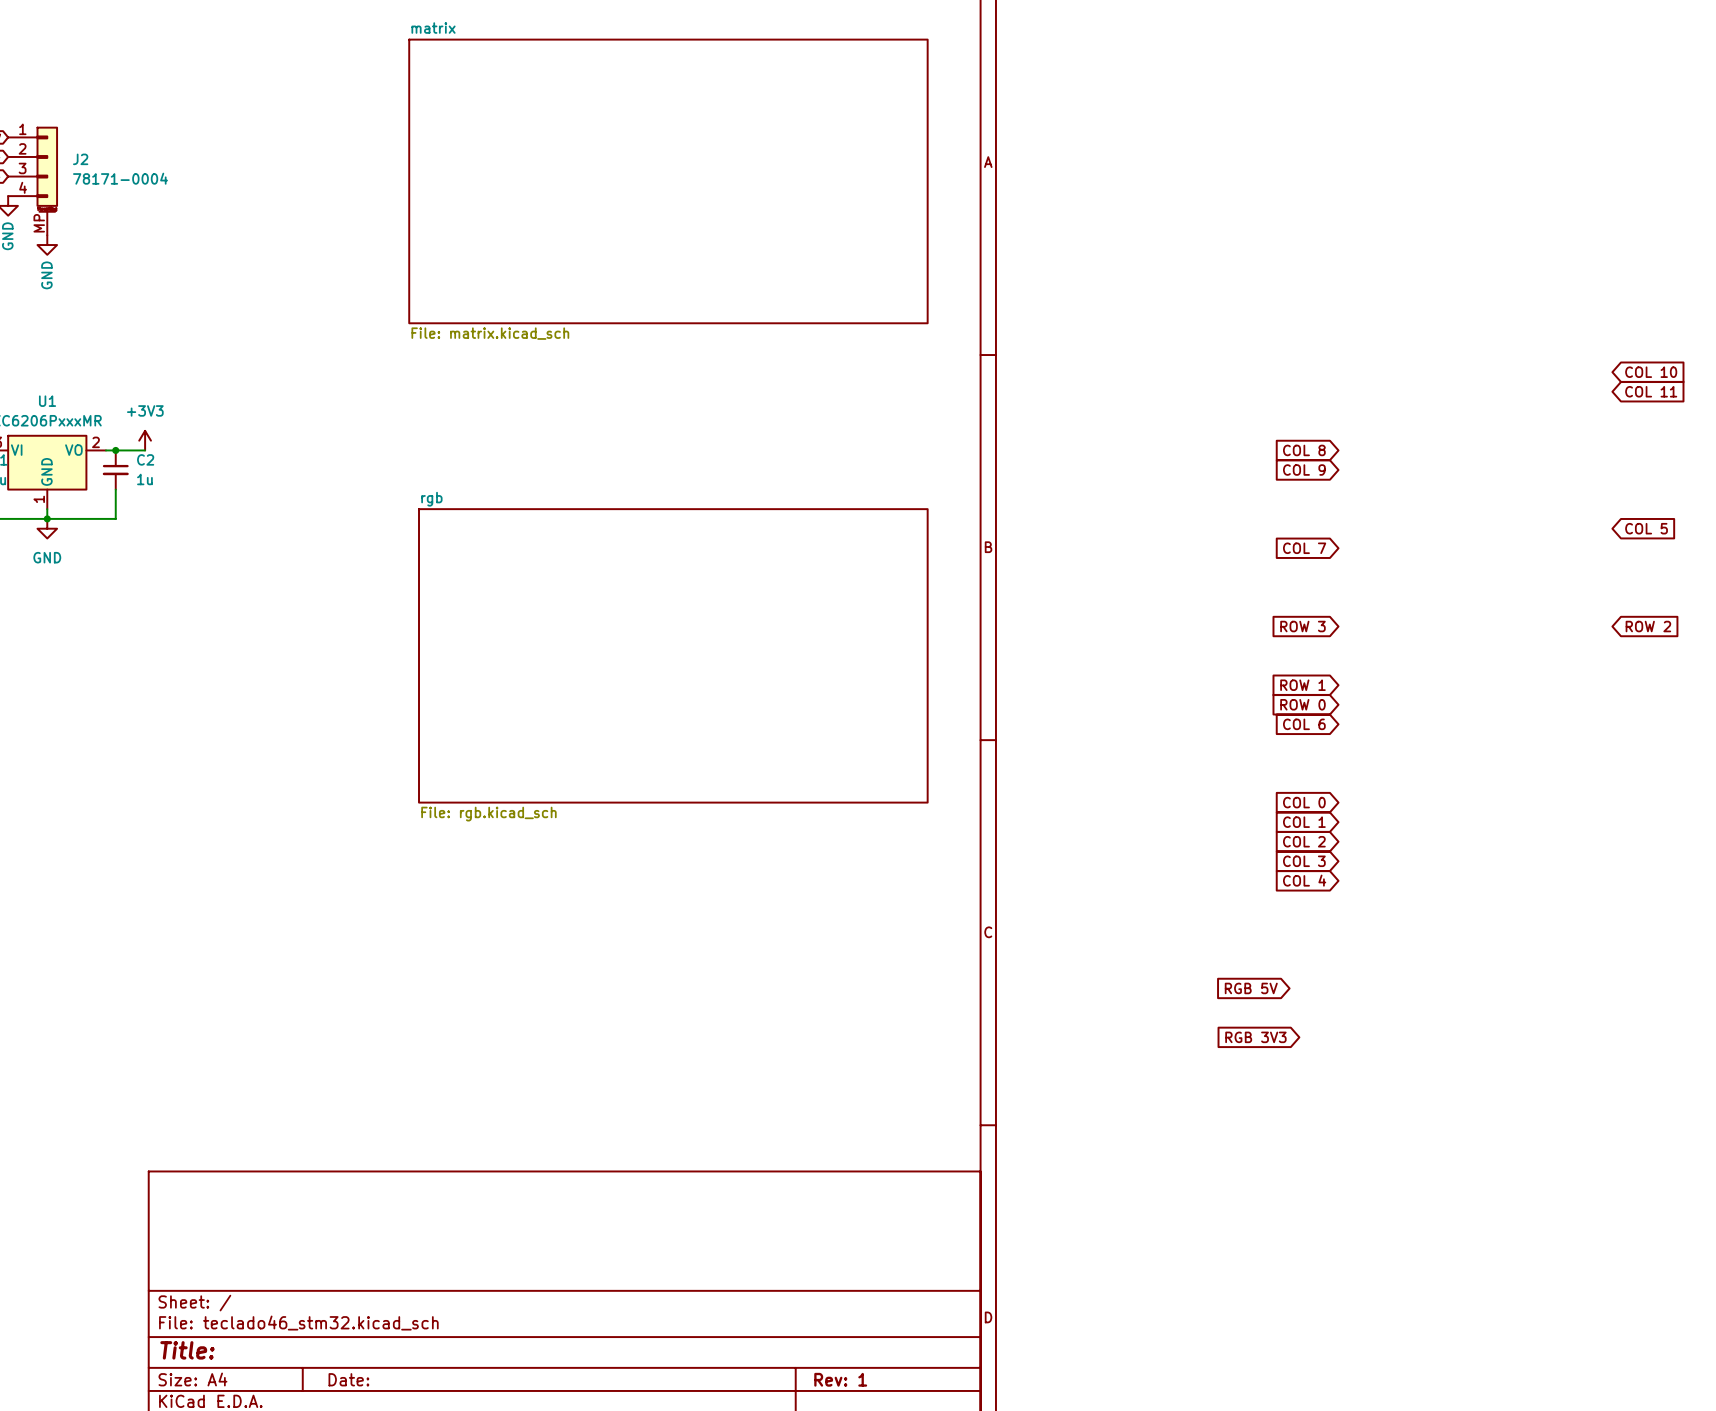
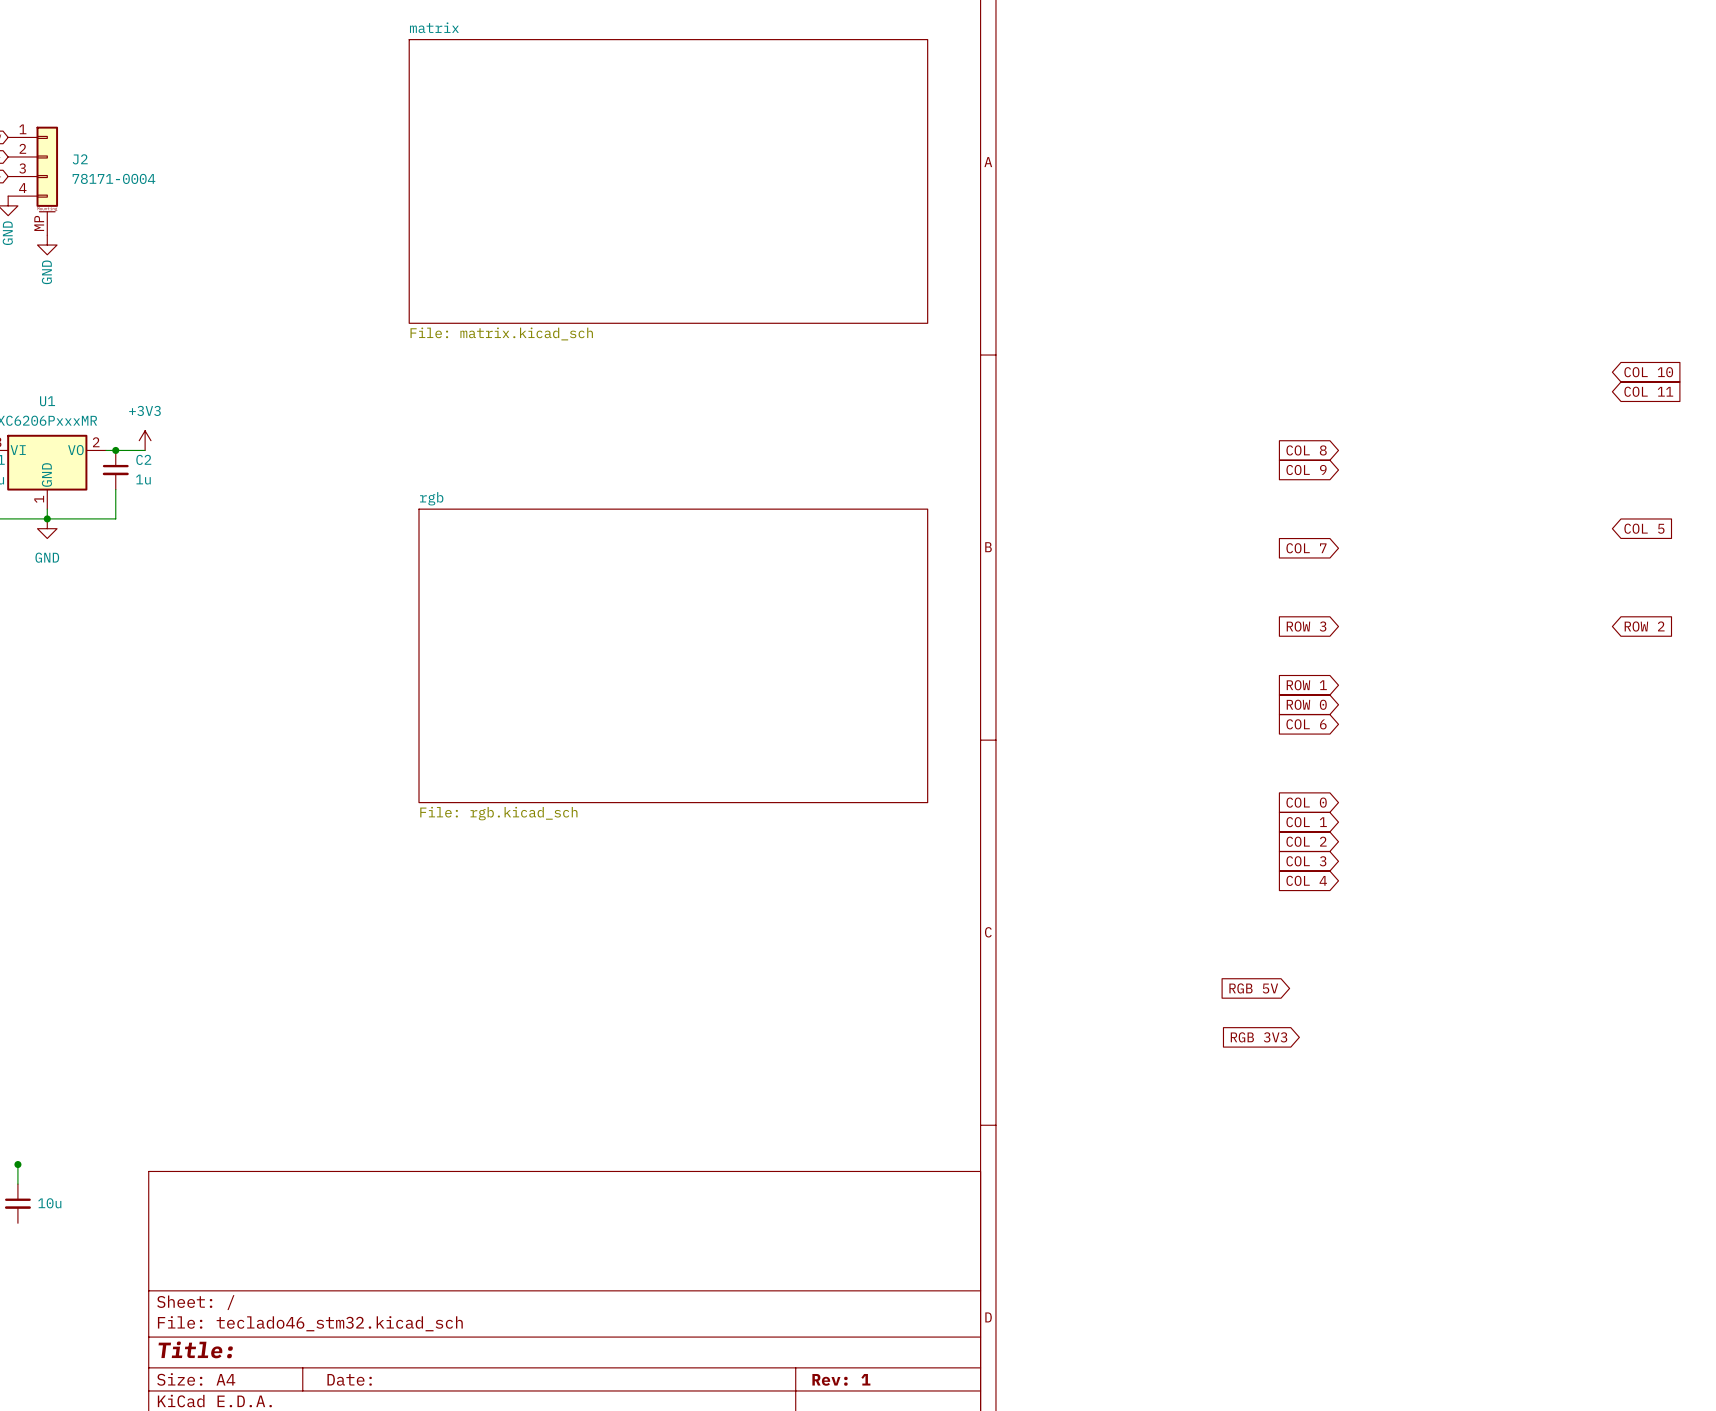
wire: none -> (17, 1164) (17, 1184)
junction: none -> (17, 1164)
part: none -> 10u (17, 1203)

